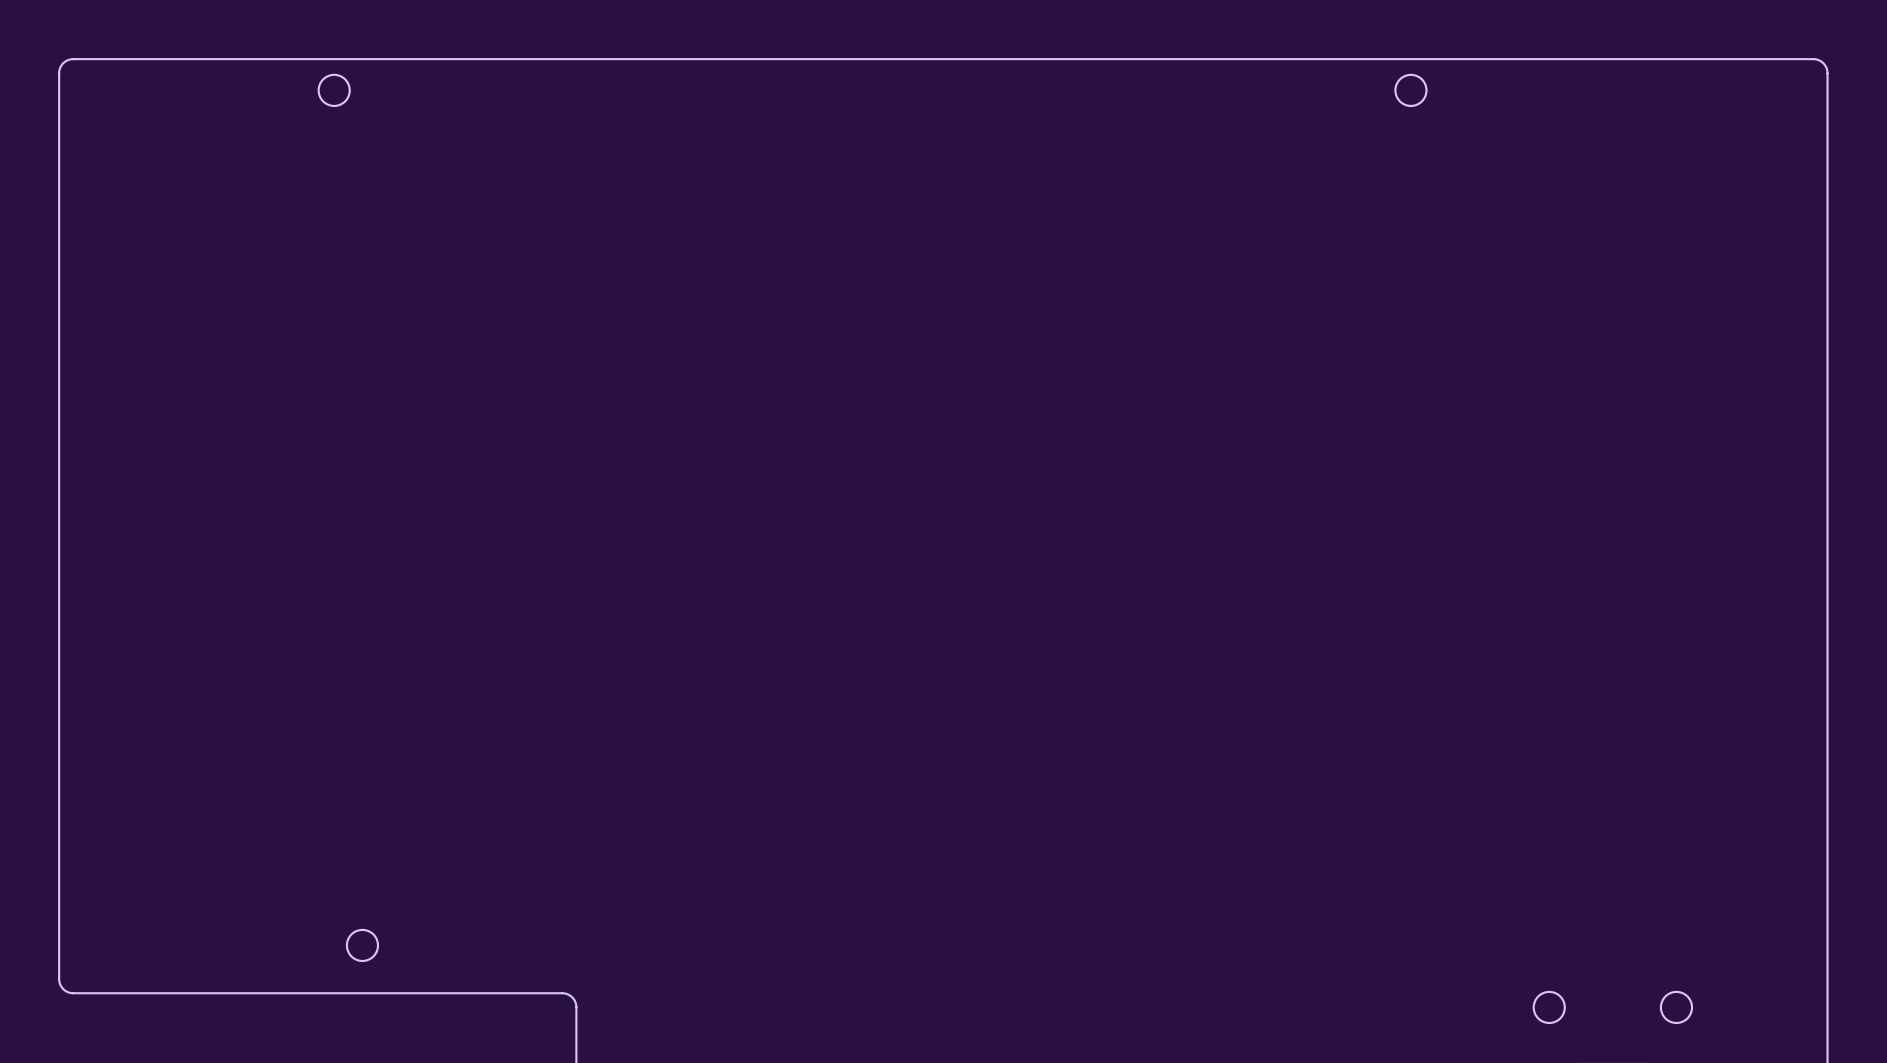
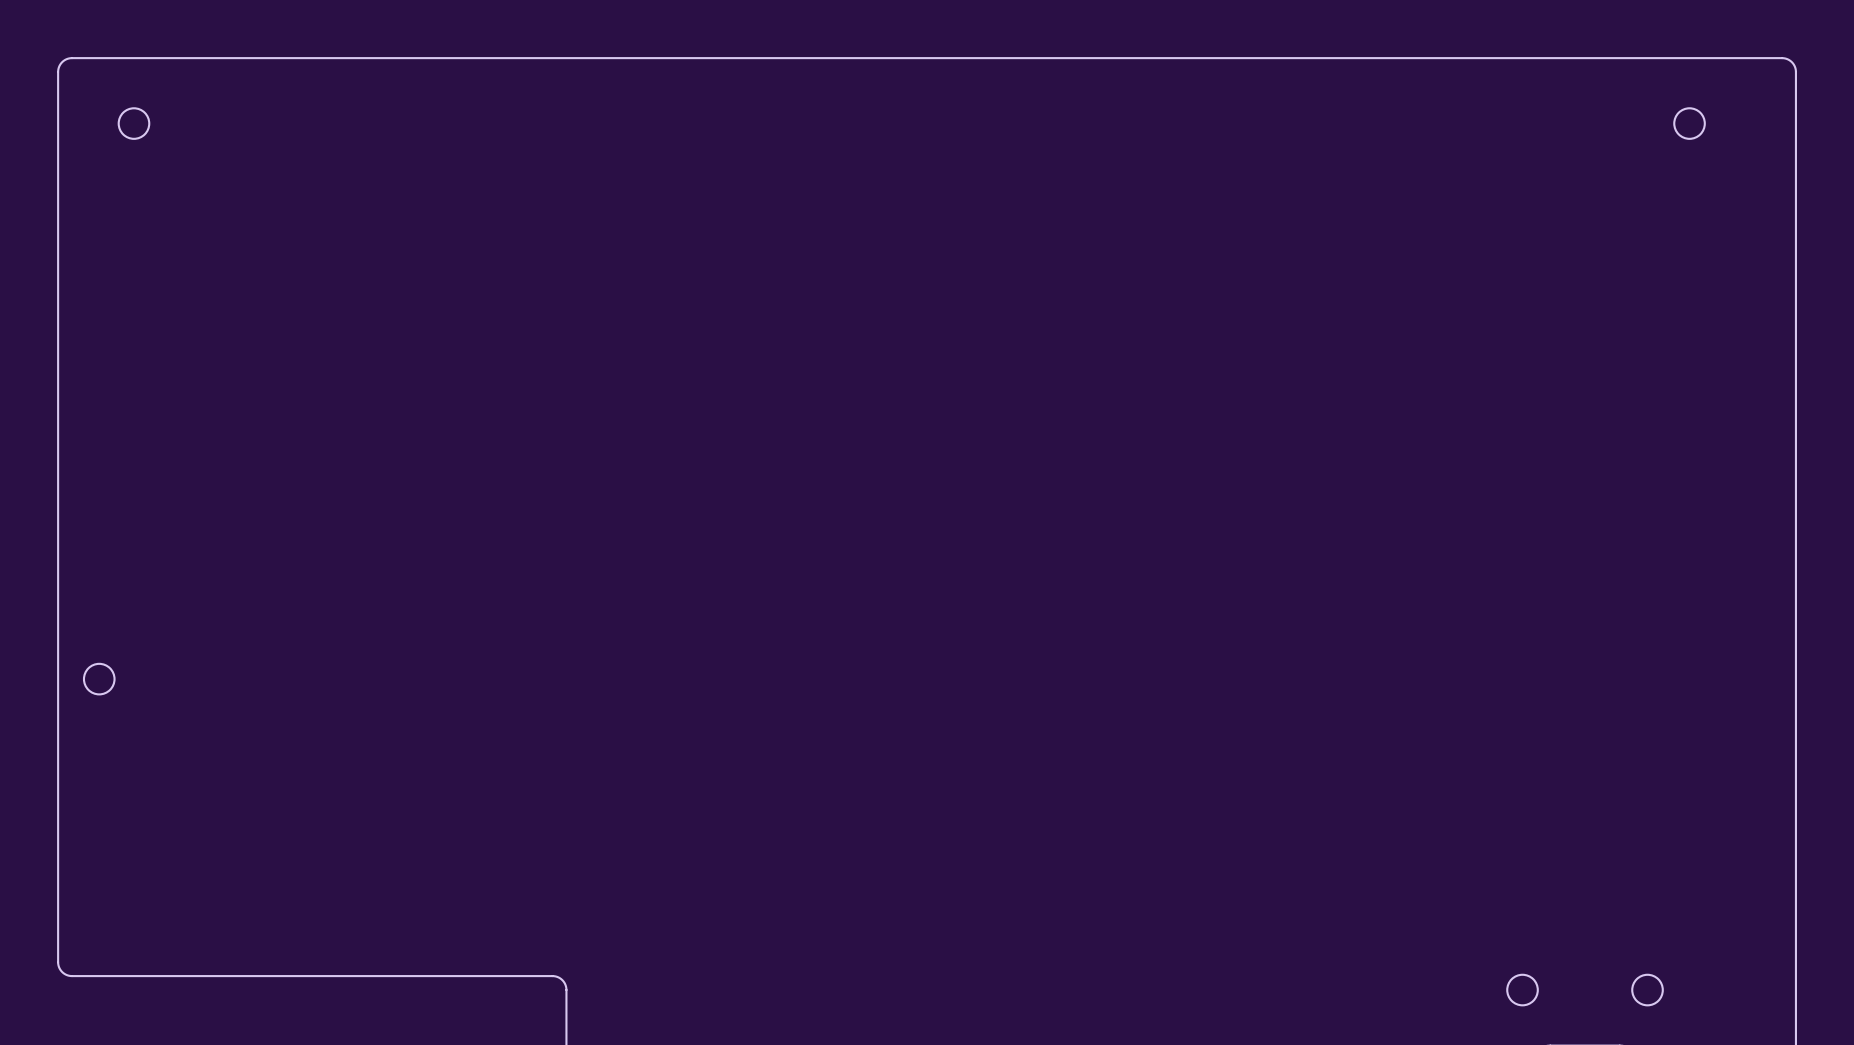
round board edge position: (334, 90) -> (133, 123)
round board edge position: (1410, 90) -> (1689, 123)
round board edge: none -> [82, 662, 116, 696]
round board edge: [345, 928, 380, 963] -> none

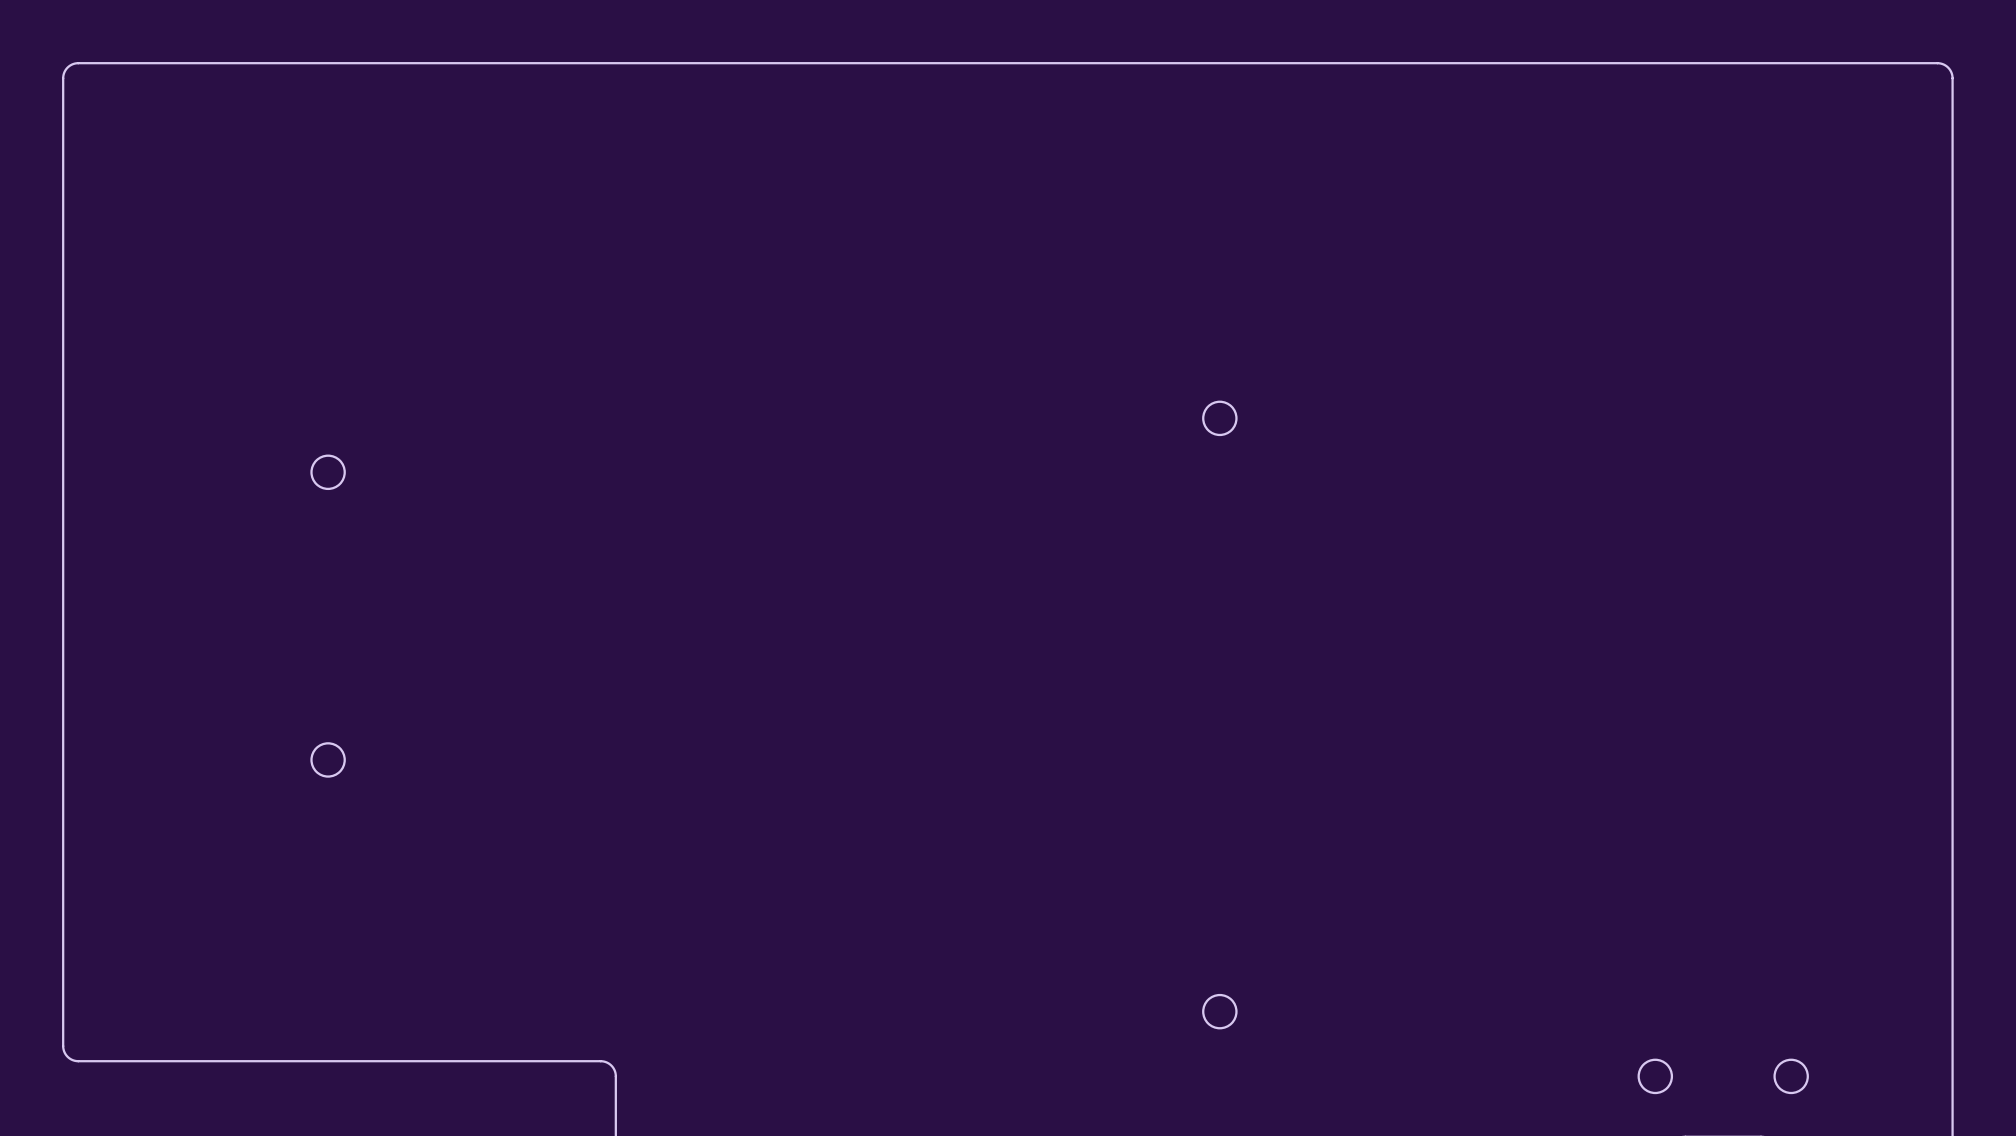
round board edge: [117, 107, 151, 140] -> none
round board edge: [1673, 107, 1706, 140] -> none
round board edge: none -> [1202, 400, 1238, 437]
round board edge: none -> [310, 454, 346, 491]
round board edge: [82, 662, 116, 696] -> none
round board edge: none -> [310, 742, 346, 778]
round board edge: none -> [1202, 993, 1238, 1030]

